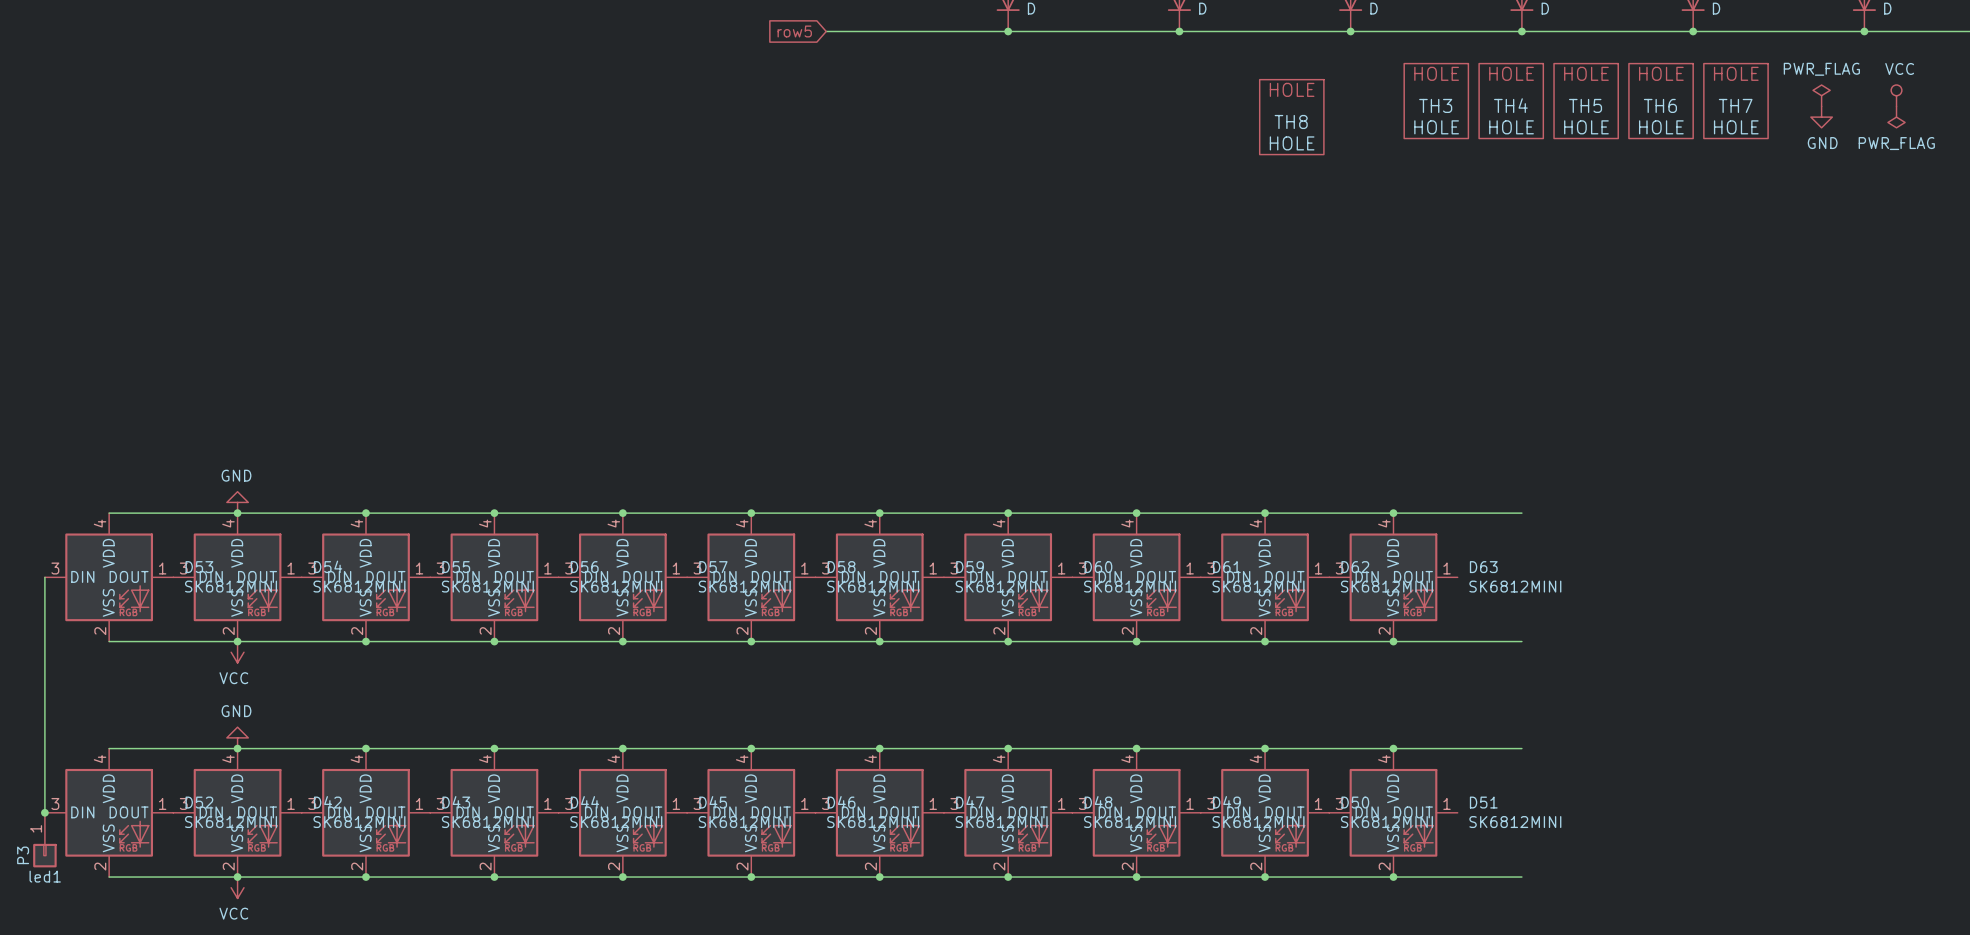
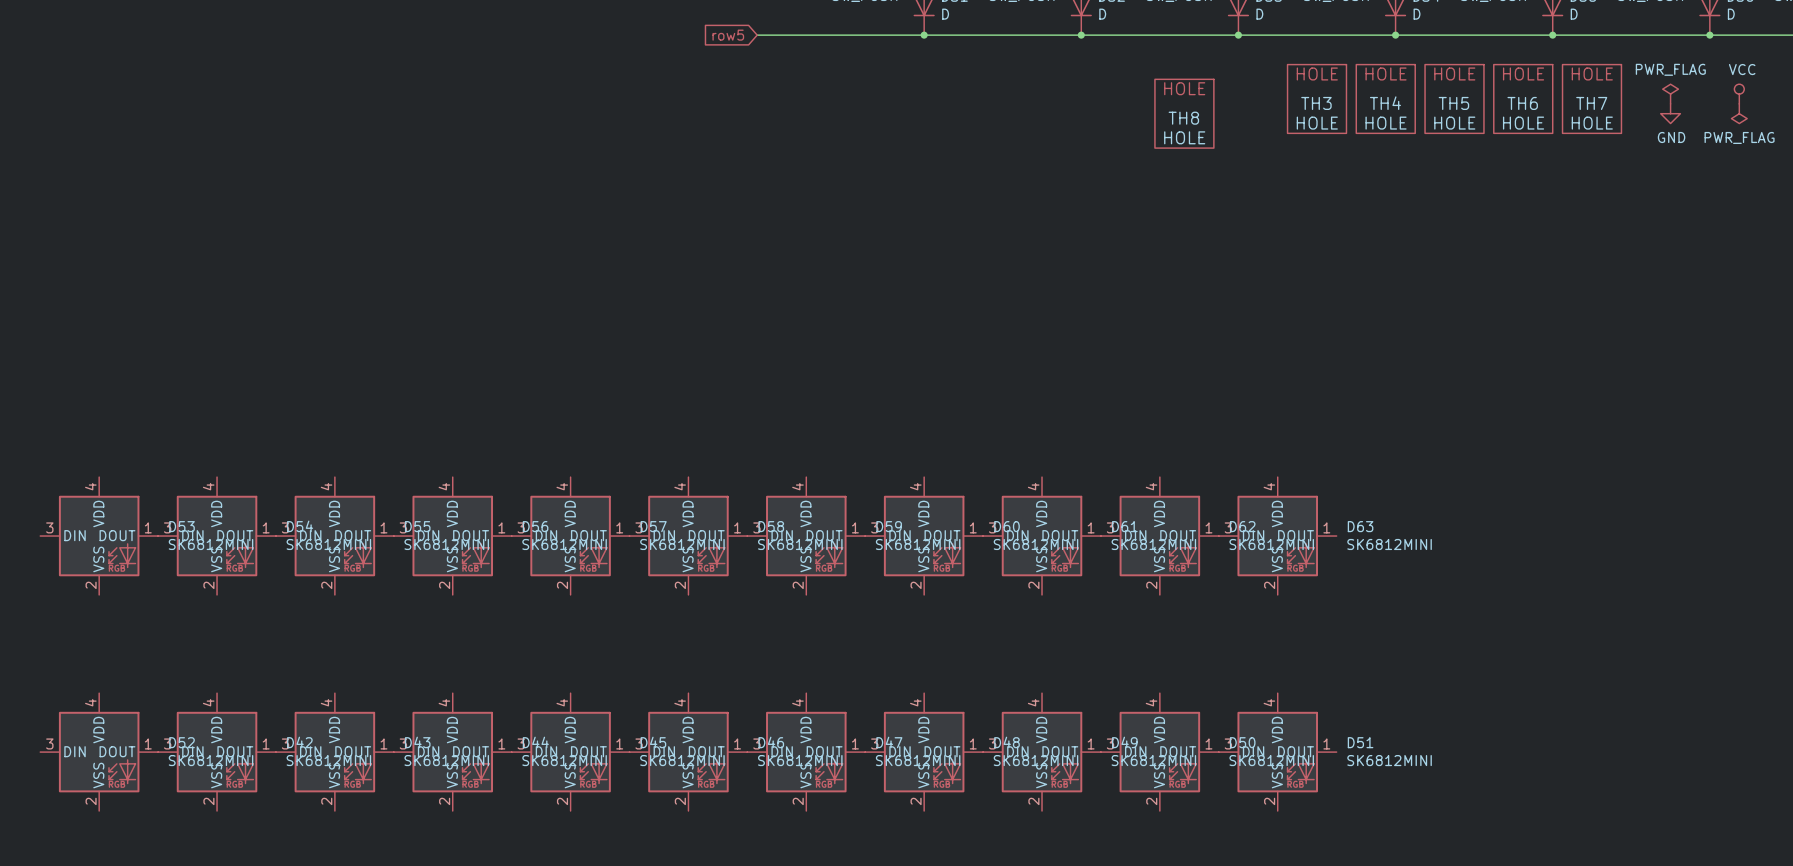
power symbol: GND (237, 502) -> none
wire: (109, 513) (1521, 513) -> none
junction: (237, 513) -> none
junction: (366, 513) -> none
junction: (494, 513) -> none
junction: (622, 513) -> none
junction: (751, 513) -> none
junction: (879, 513) -> none
junction: (1008, 513) -> none
junction: (1136, 513) -> none
junction: (1265, 513) -> none
junction: (1393, 513) -> none
wire: (44, 577) (44, 812) -> none
wire: (109, 641) (1521, 641) -> none
junction: (237, 641) -> none
junction: (366, 641) -> none
junction: (494, 641) -> none
junction: (622, 641) -> none
junction: (751, 641) -> none
junction: (879, 641) -> none
junction: (1008, 641) -> none
junction: (1136, 641) -> none
junction: (1265, 641) -> none
junction: (1393, 641) -> none
power symbol: VCC (237, 652) -> none
power symbol: GND (237, 737) -> none
wire: (109, 748) (1521, 748) -> none
junction: (237, 748) -> none
junction: (366, 748) -> none
junction: (494, 748) -> none
junction: (622, 748) -> none
junction: (751, 748) -> none
junction: (879, 748) -> none
junction: (1008, 748) -> none
junction: (1136, 748) -> none
junction: (1265, 748) -> none
junction: (1393, 748) -> none
junction: (44, 812) -> none
P3: led1 (44, 840) -> none
wire: (109, 877) (1521, 877) -> none
junction: (237, 877) -> none
junction: (366, 877) -> none
junction: (494, 877) -> none
junction: (622, 877) -> none
junction: (751, 877) -> none
junction: (879, 877) -> none
junction: (1008, 877) -> none
junction: (1136, 877) -> none
junction: (1265, 877) -> none
junction: (1393, 877) -> none
power symbol: VCC (237, 887) -> none

